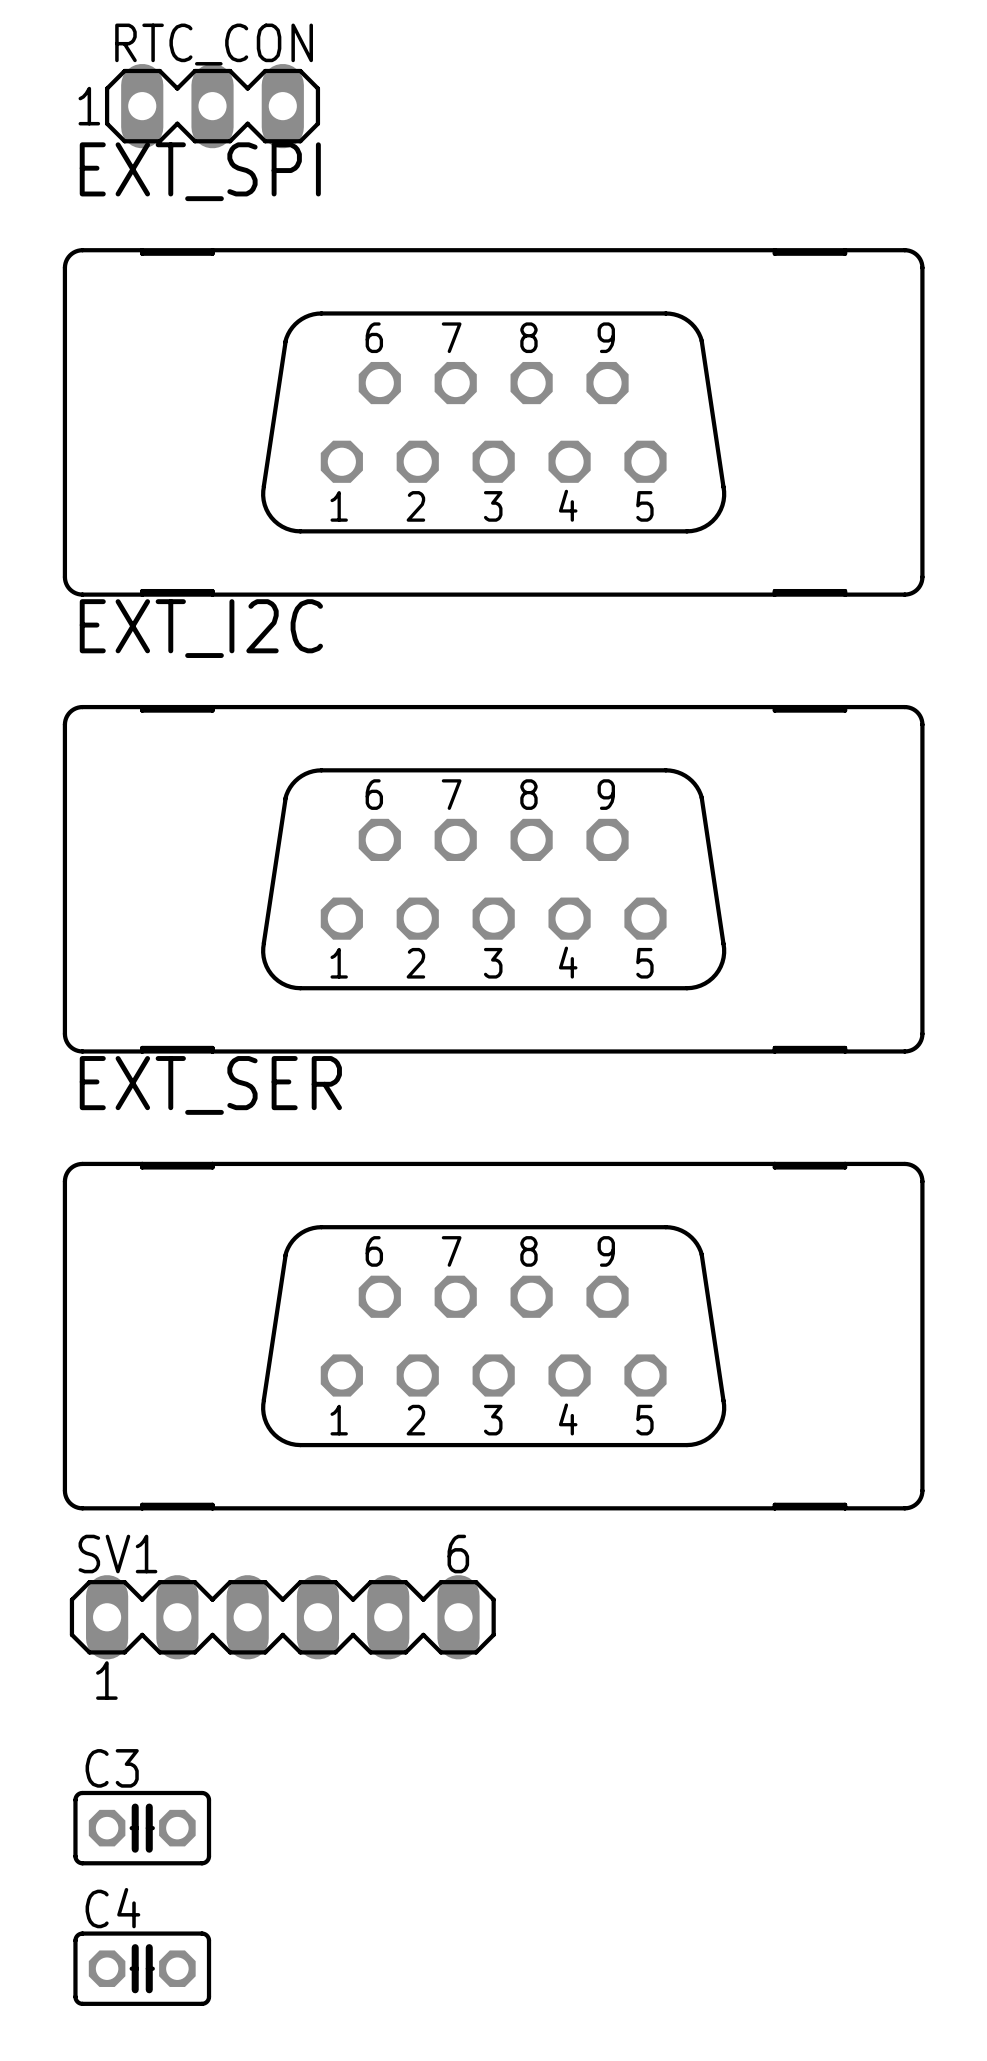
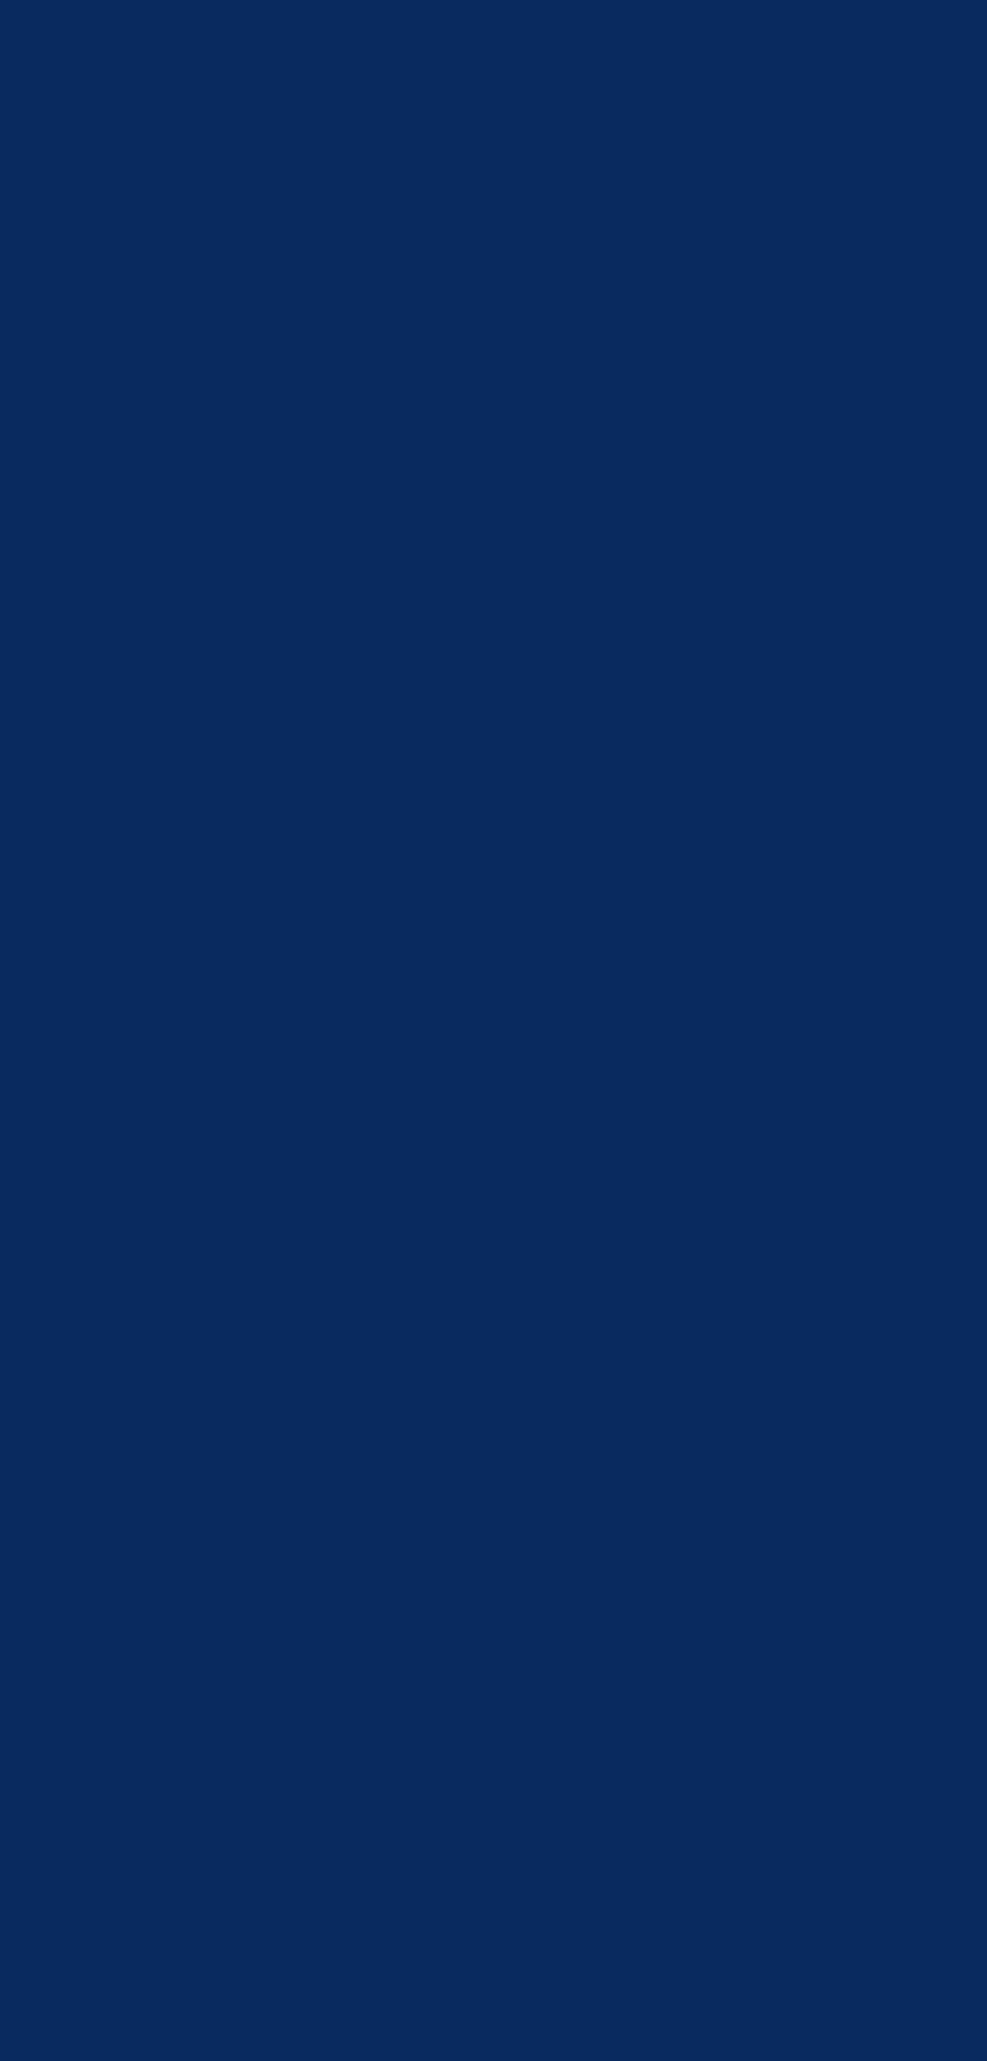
RTC_CON: (212, 106) -> none
EXT_SPI: (493, 422) -> none
EXT_I2C: (493, 879) -> none
EXT_SER: (493, 1336) -> none
SV1: (282, 1617) -> none
C3: (142, 1828) -> none
C4: (142, 1968) -> none

